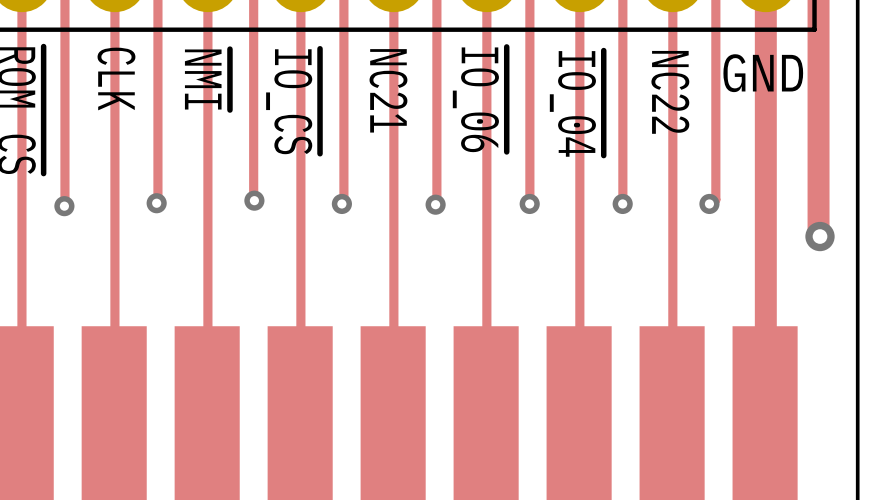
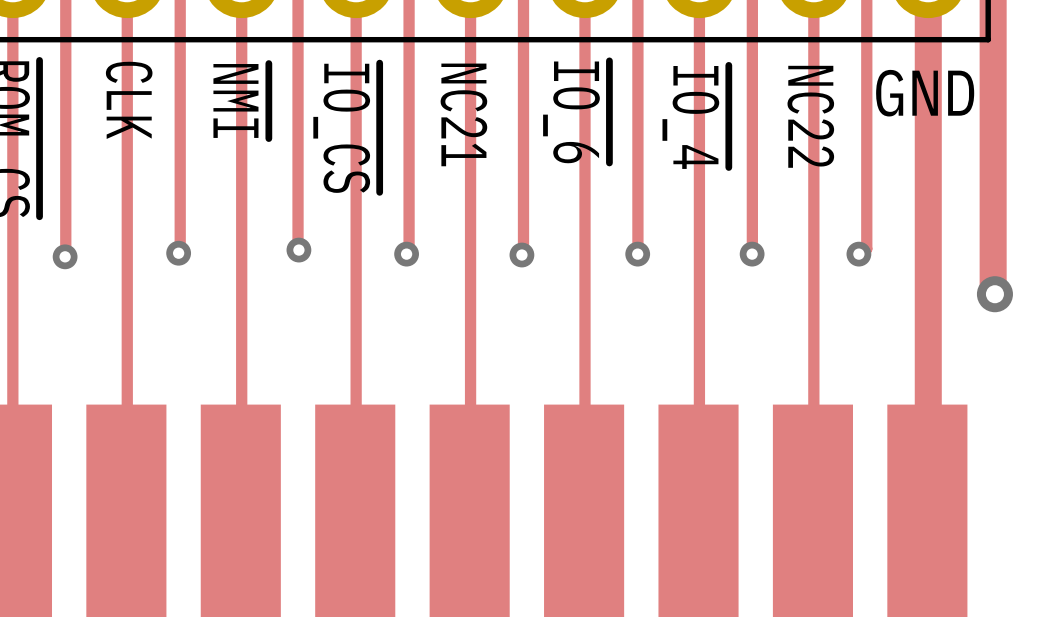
text: ~{IO_06} (479, 99) -> ~{IO_6} (576, 112)
text: ~{IO_04} (576, 103) -> ~{IO_4} (695, 117)

